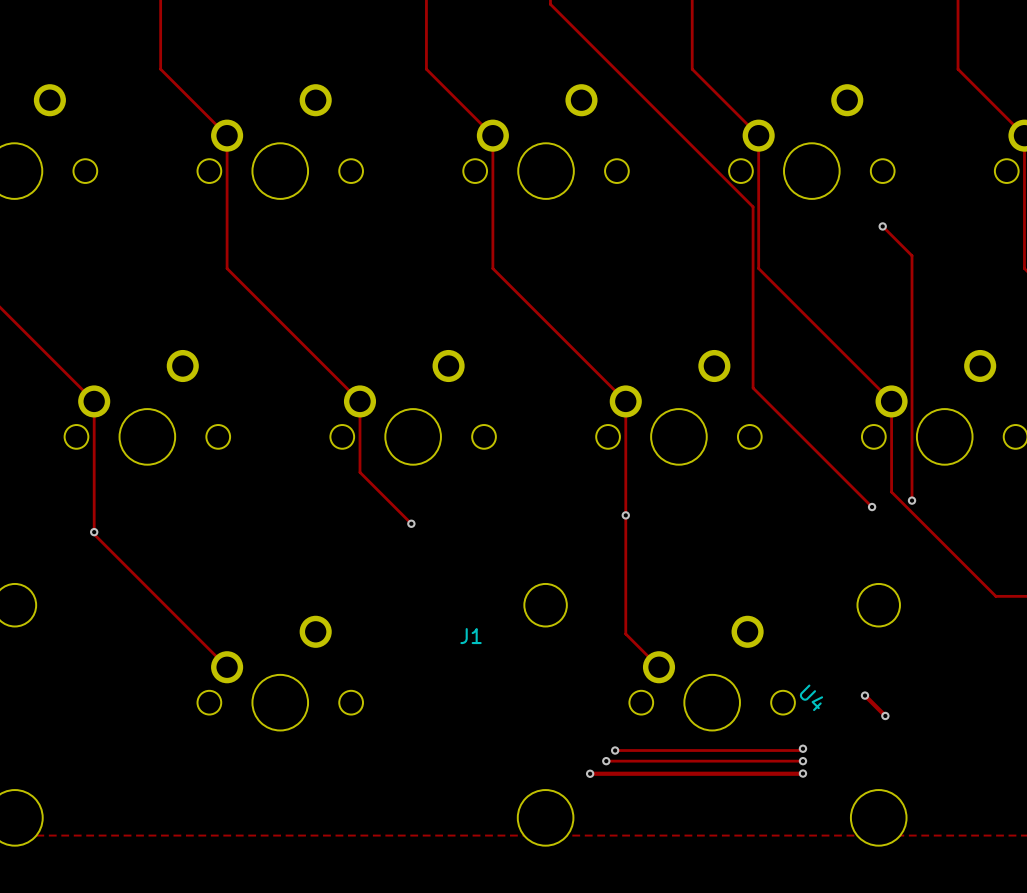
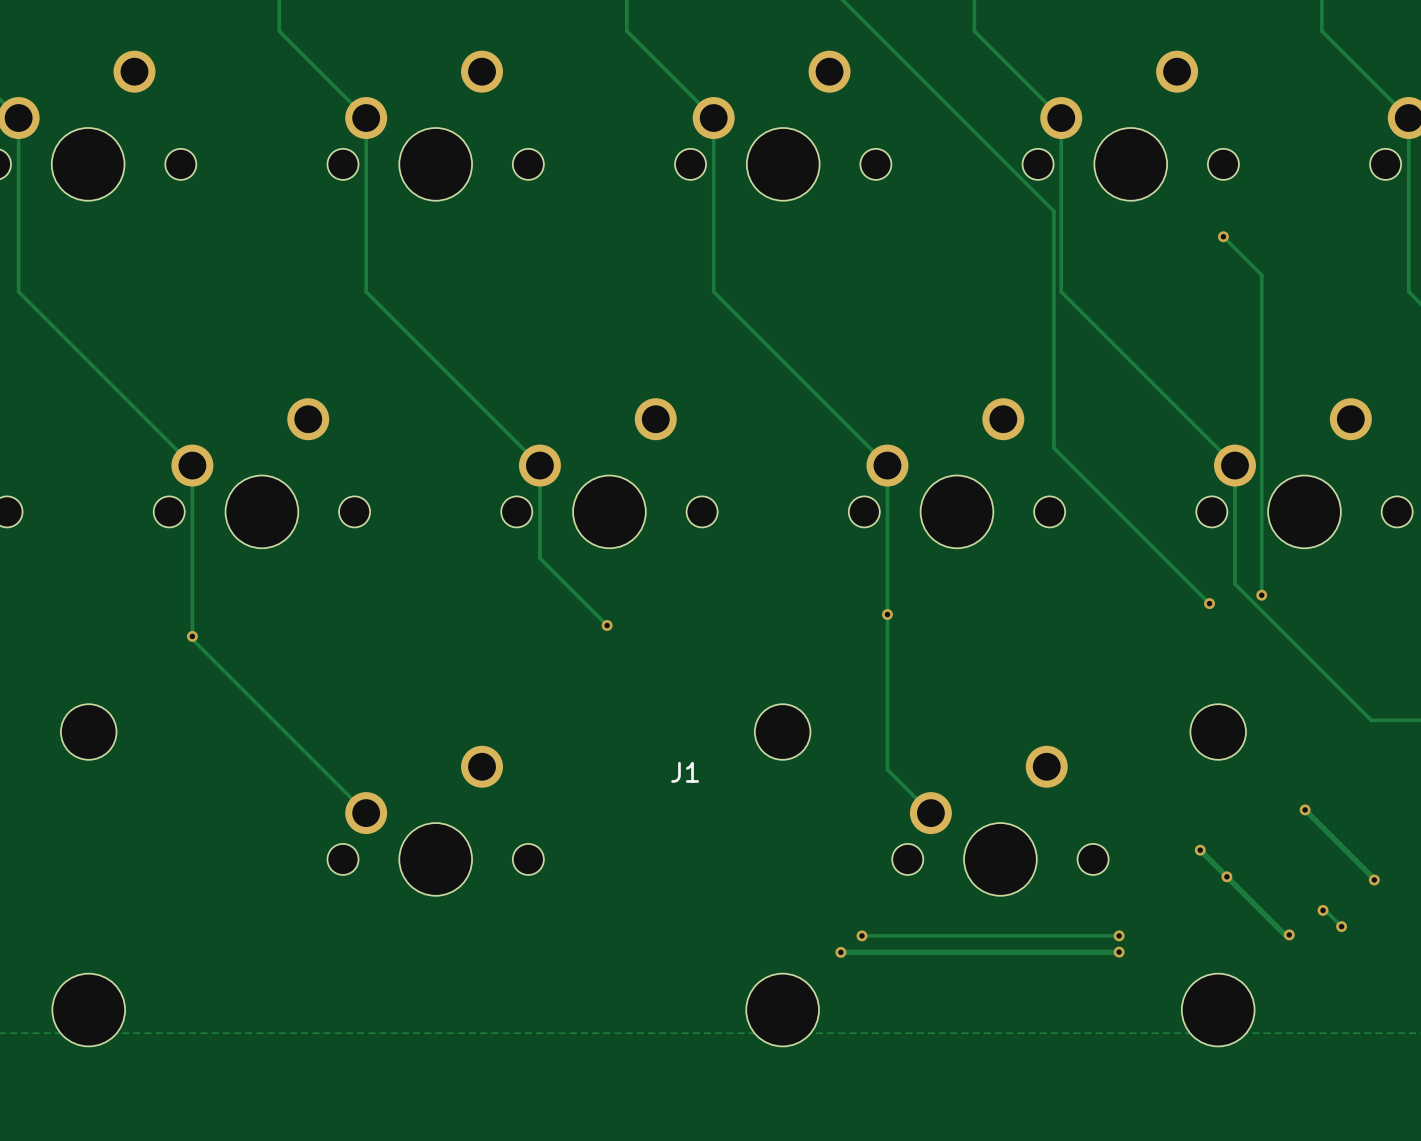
track: none -> (1305, 809) (1374, 879)
via: none -> (1305, 809)
U4: (811, 697) -> none
track: none -> (1226, 876) (1284, 934) (1289, 934) (1289, 932)
via: none -> (1374, 879)
track: none -> (1323, 910) (1325, 910) (1341, 926)
via: none -> (1323, 910)
track: (802, 748) (801, 750) (615, 750) -> none
via: (802, 748) -> none
via: (615, 750) -> none
via: none -> (1341, 926)
via: none -> (1289, 934)

